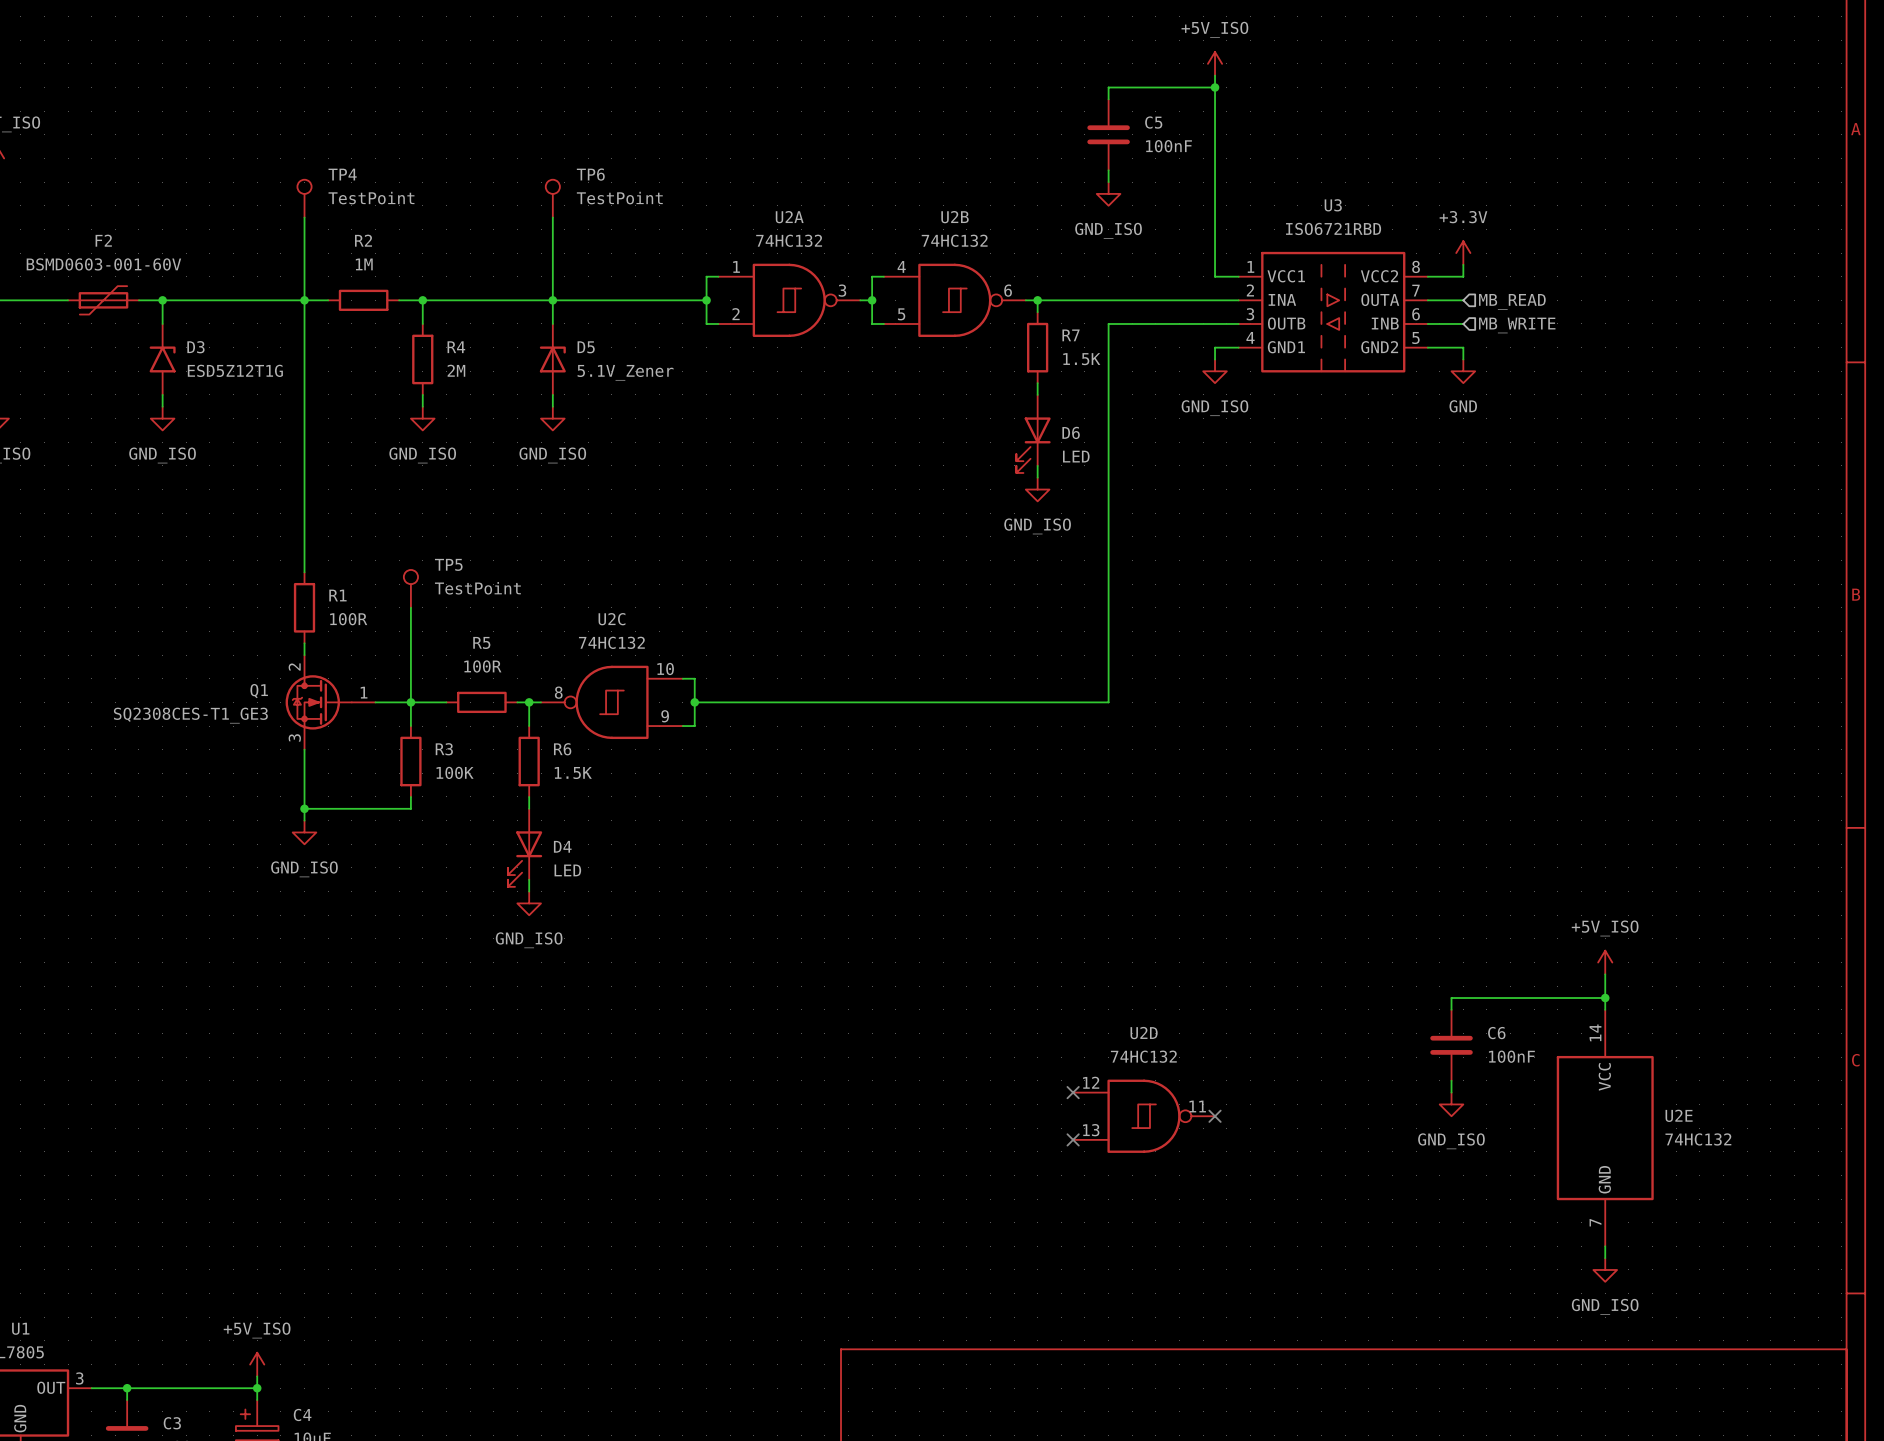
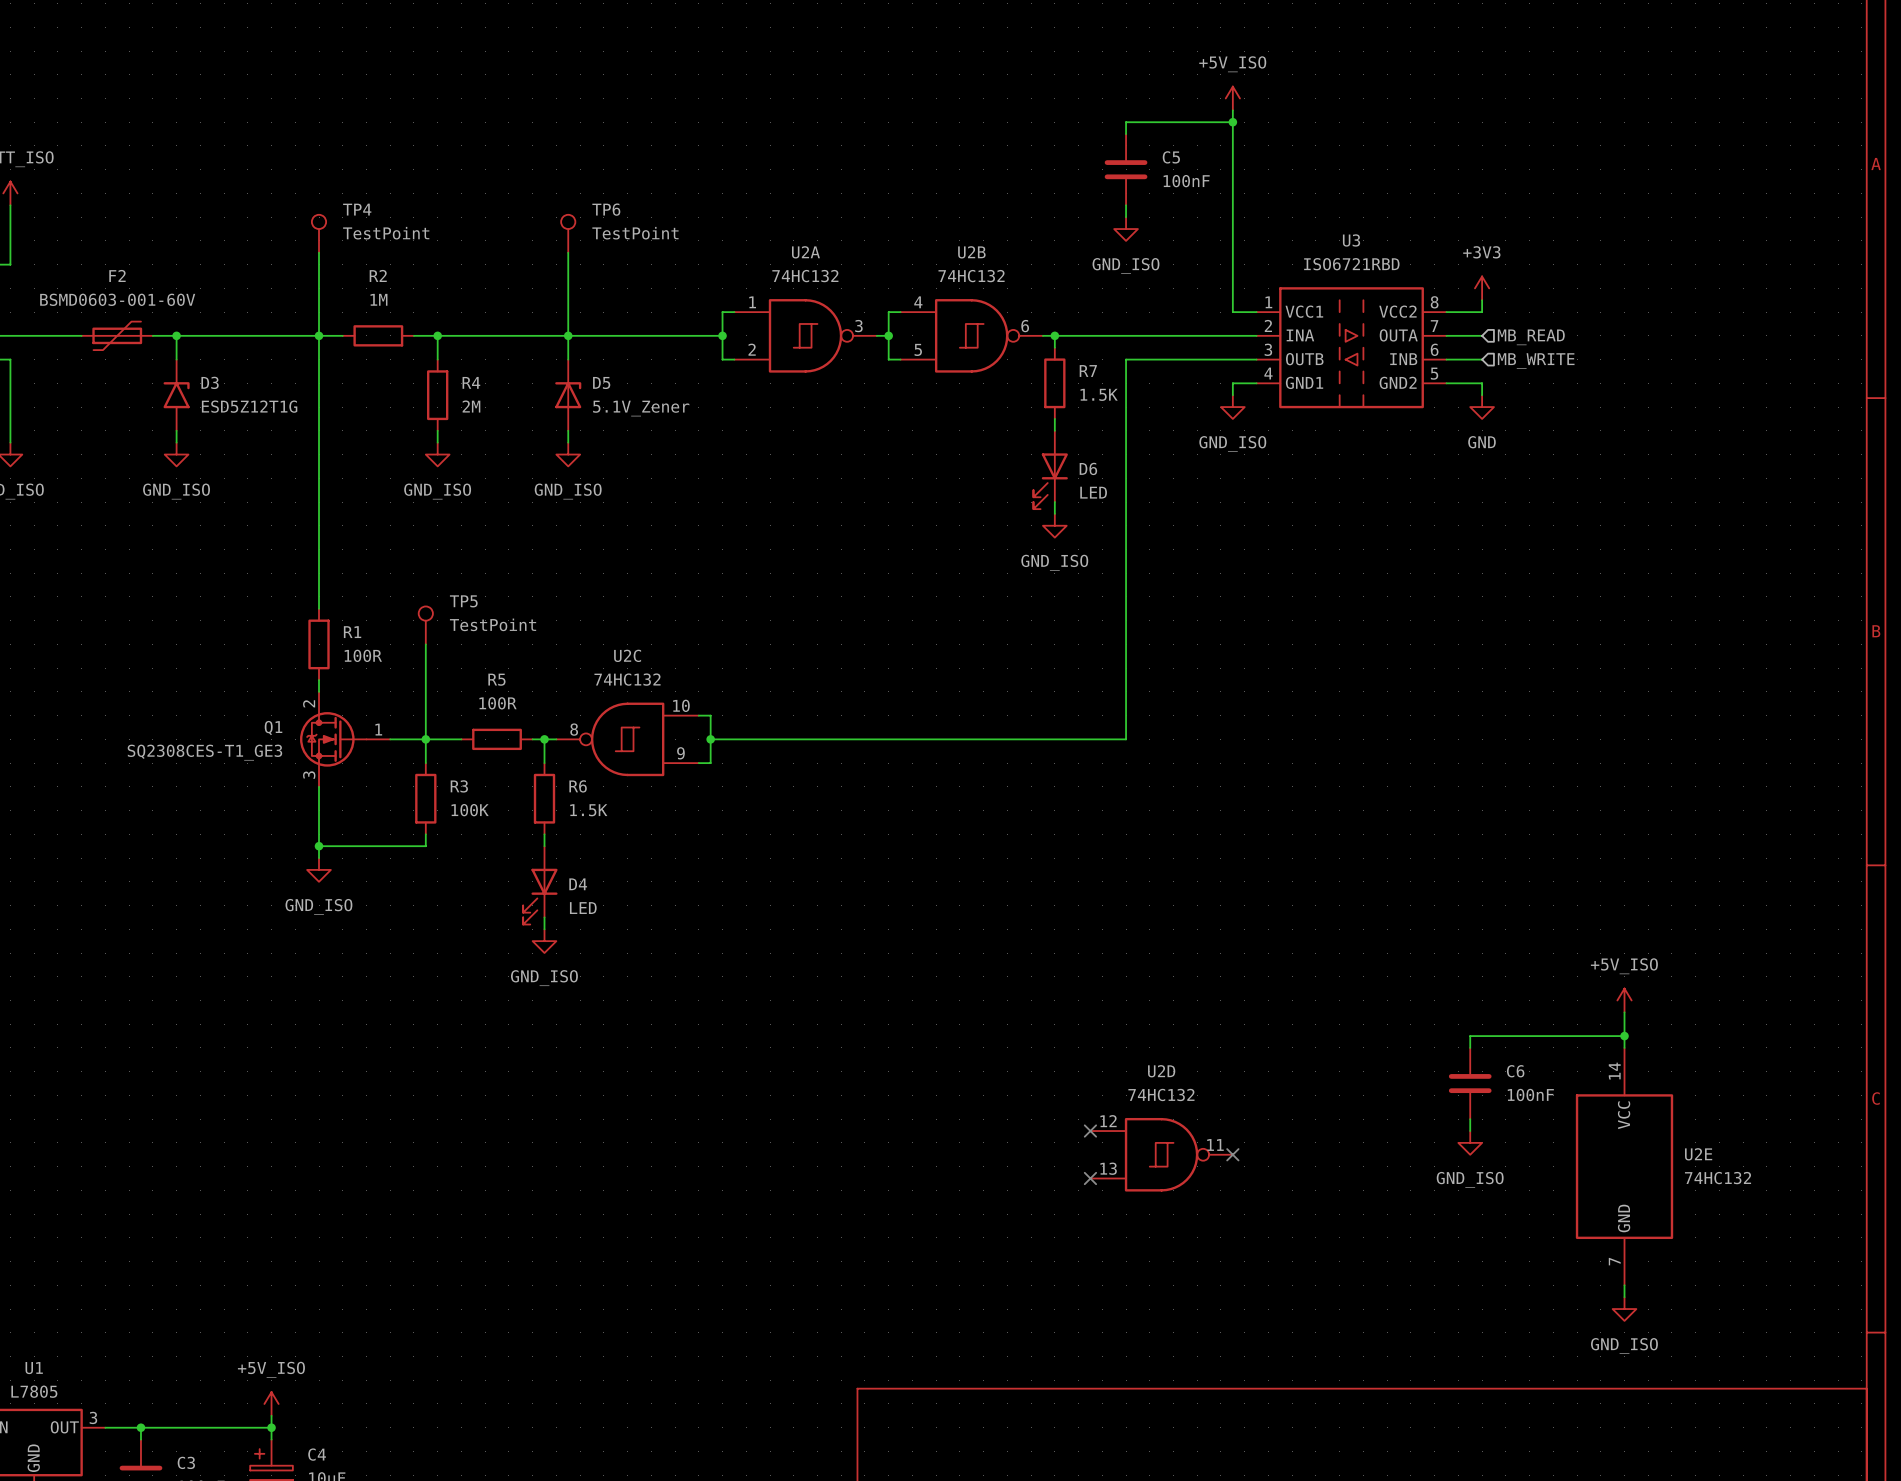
power symbol: +3.3V (1463, 253) -> +3V3 (1482, 288)

